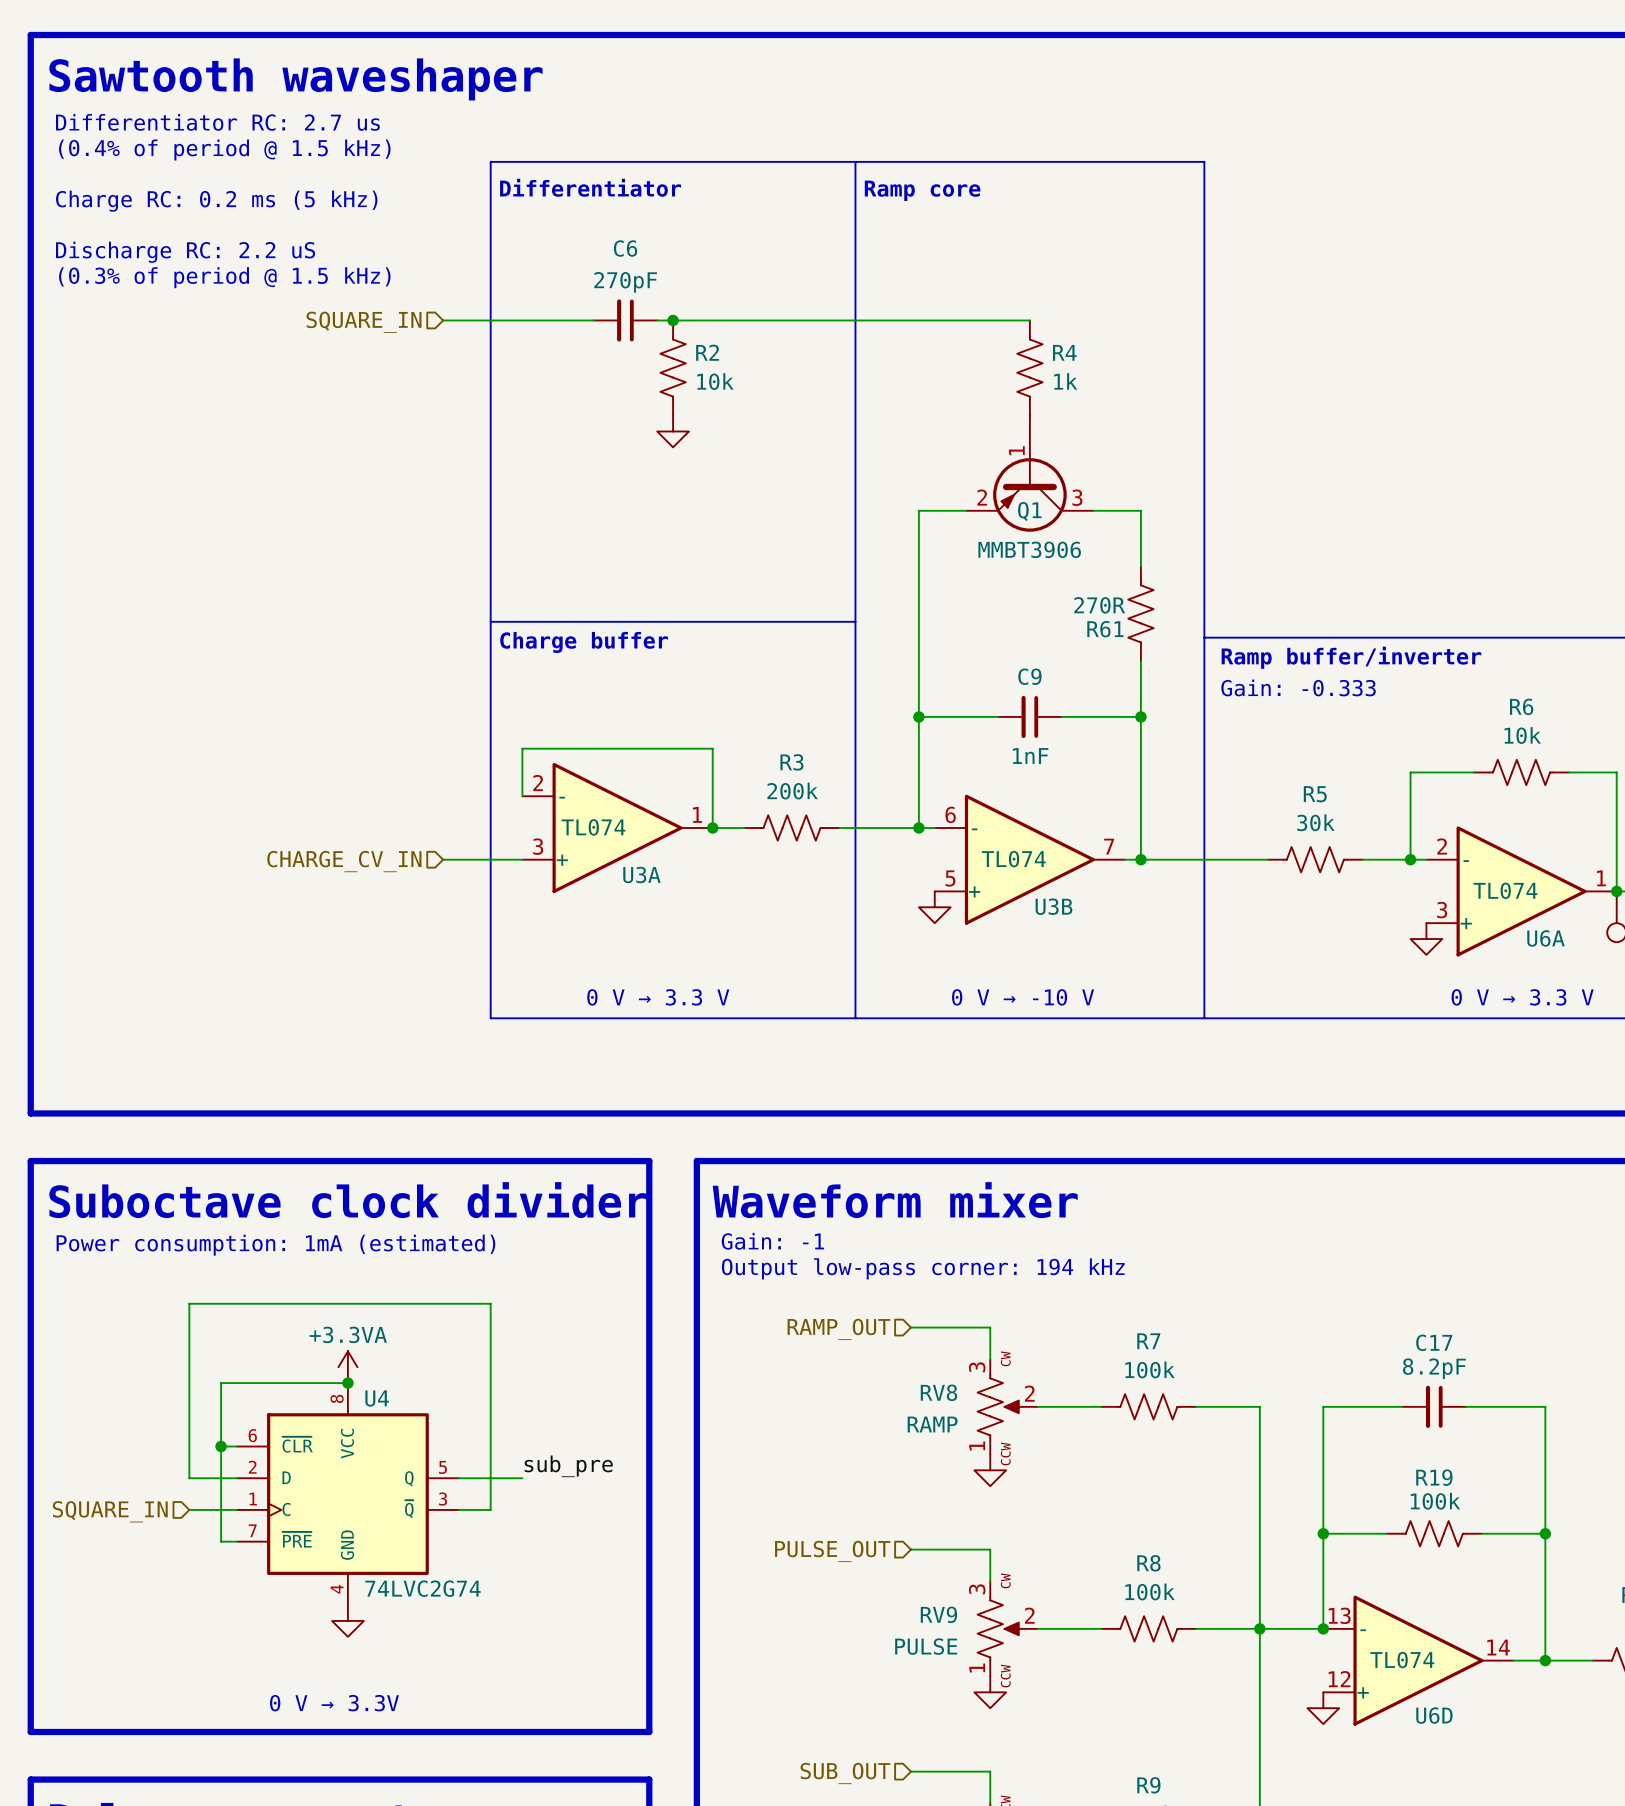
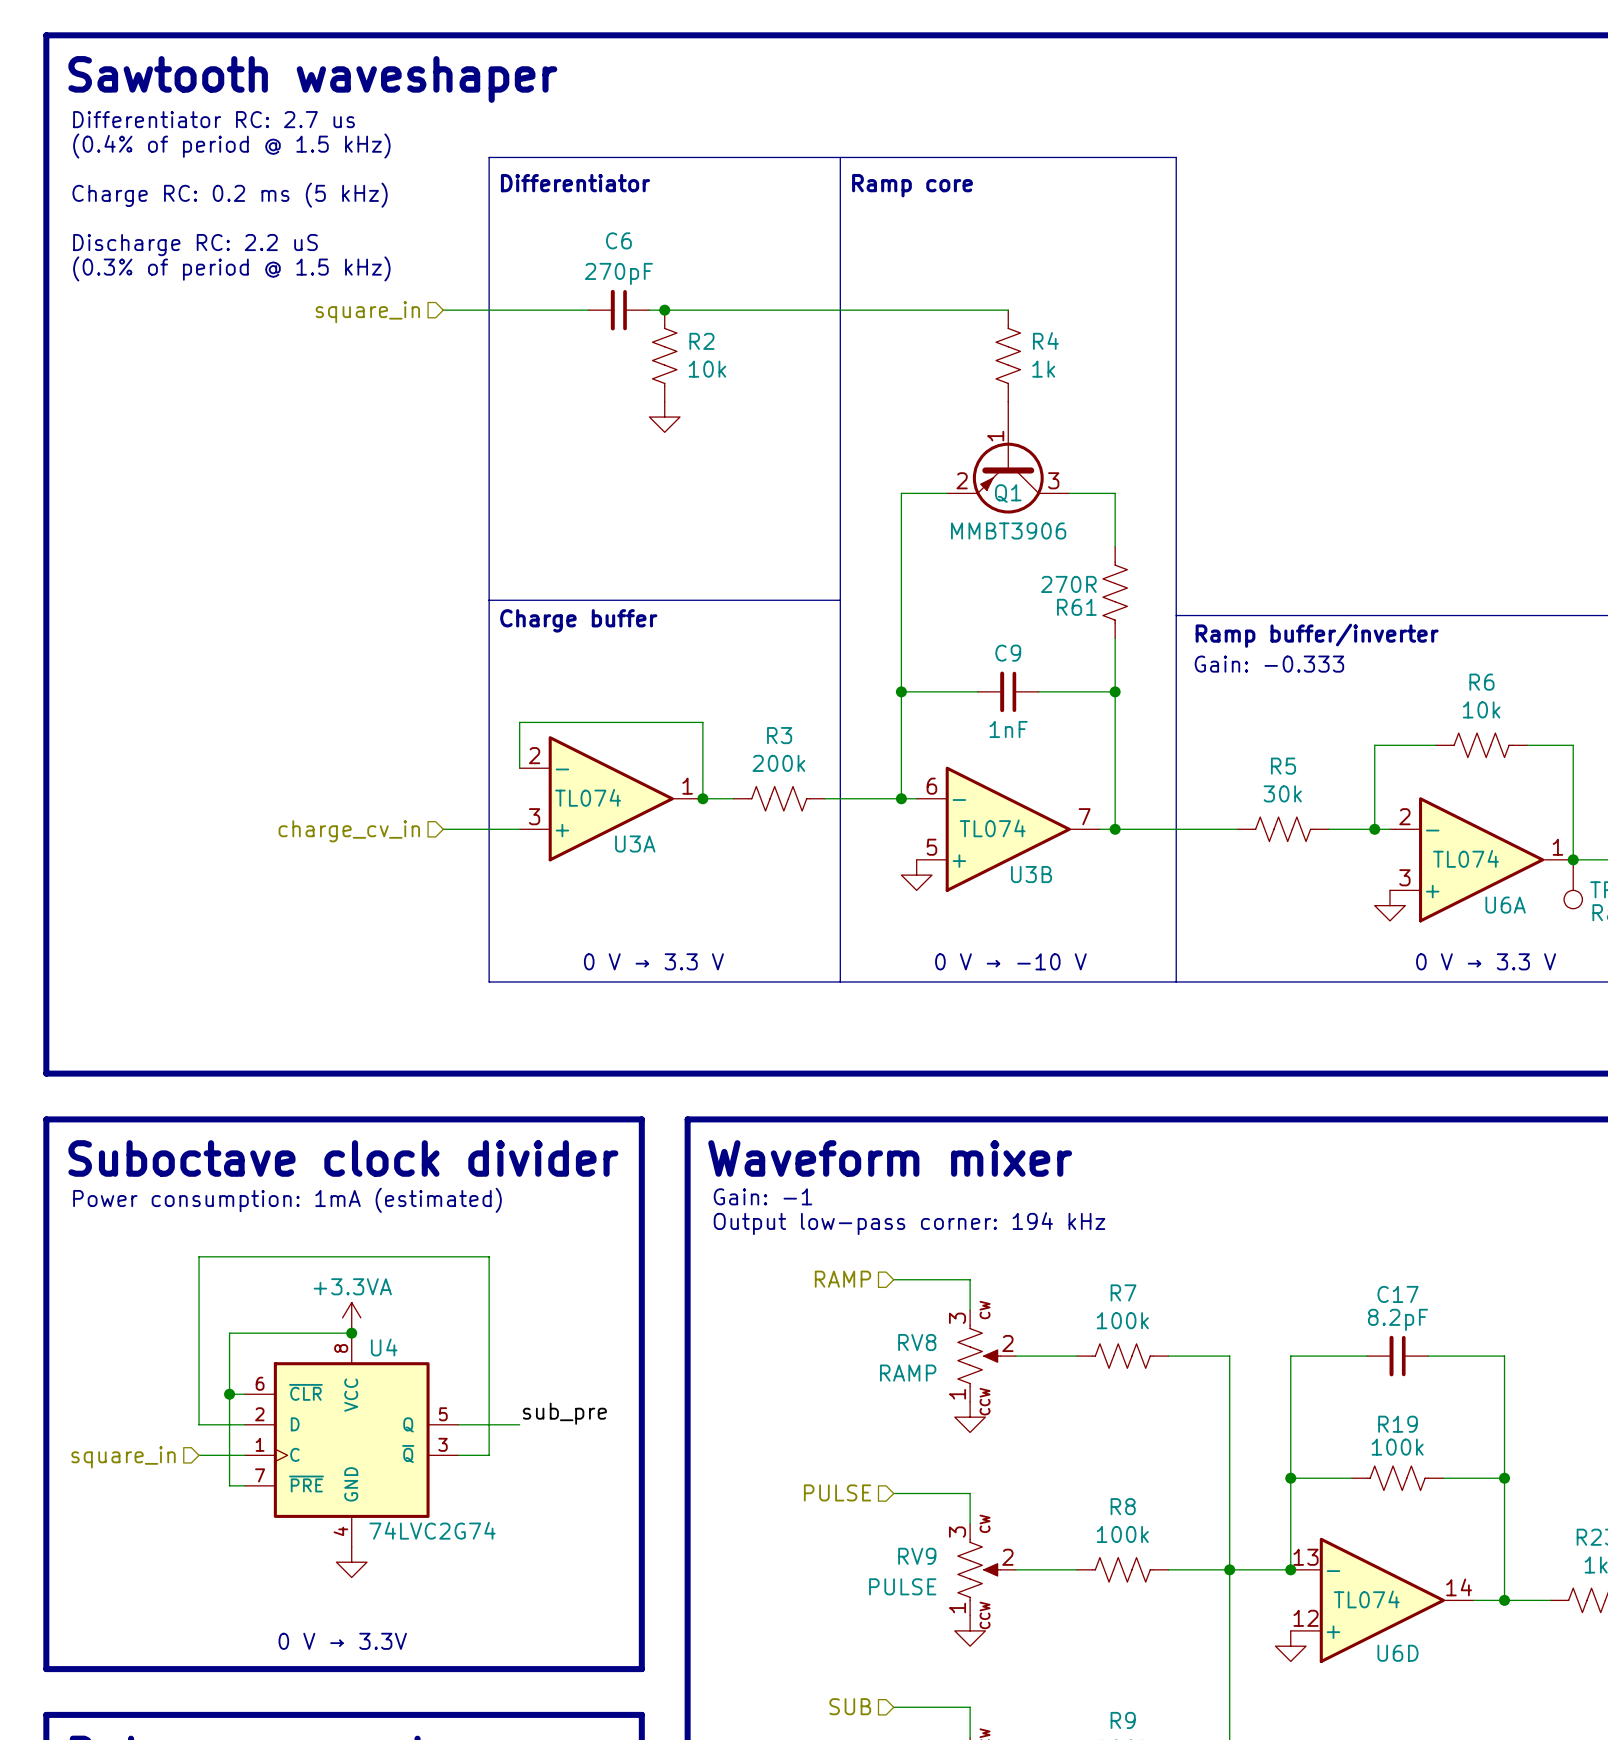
hierarchical label: SQUARE_IN (364, 322) -> square_in (367, 312)
hierarchical label: CHARGE_CV_IN (344, 861) -> charge_cv_in (349, 831)
hierarchical label: RAMP_OUT (838, 1329) -> RAMP (842, 1279)
hierarchical label: SQUARE_IN (110, 1511) -> square_in (123, 1457)
hierarchical label: PULSE_OUT (832, 1551) -> PULSE (837, 1492)
hierarchical label: SUB_OUT (845, 1773) -> SUB (850, 1706)

